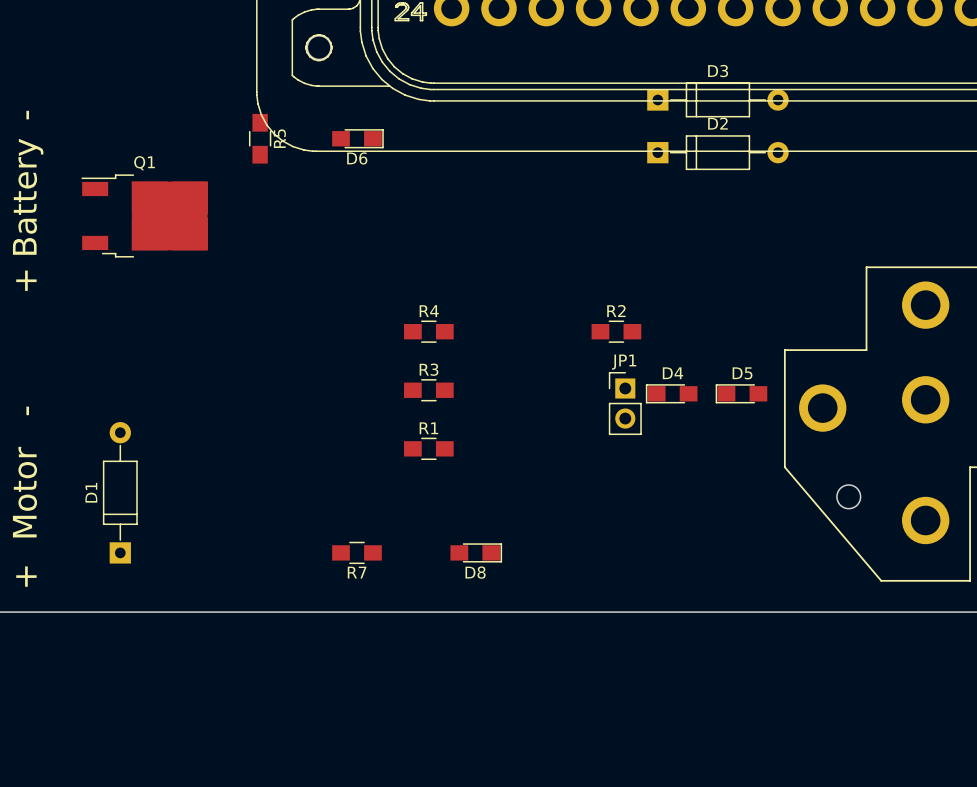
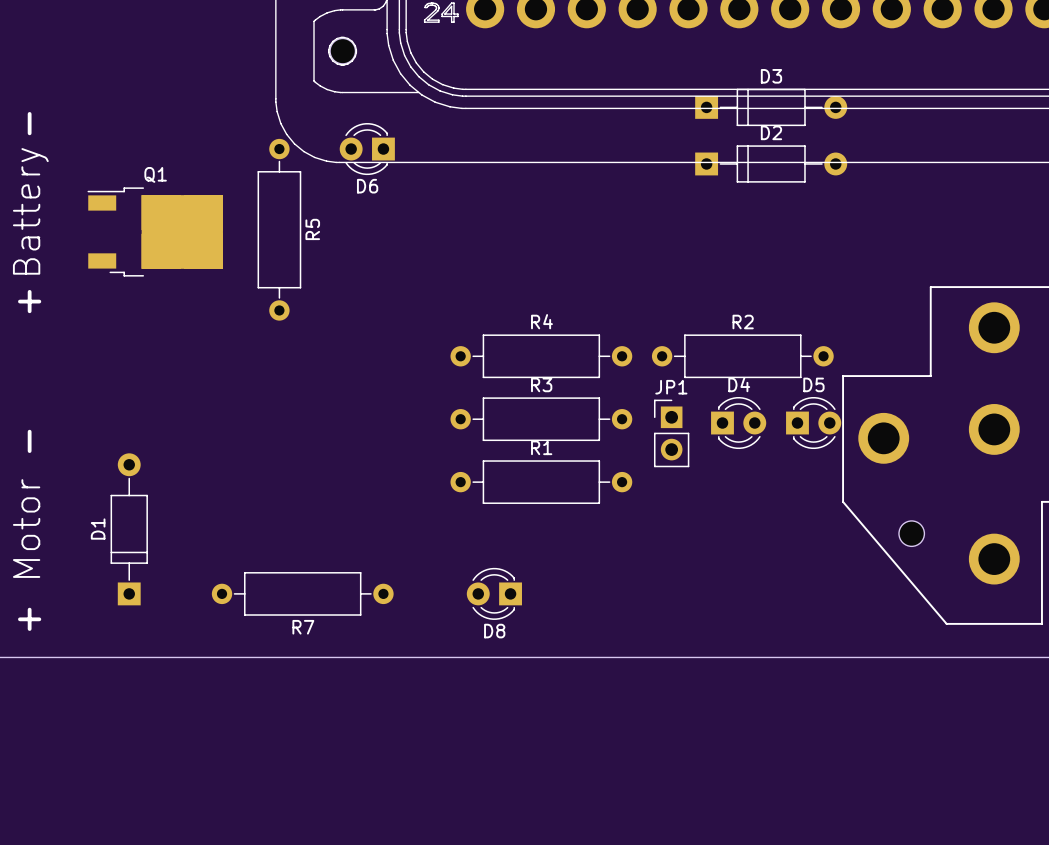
R5 footprint: [249, 113, 272, 164] -> [257, 138, 302, 321]
D6 footprint: [332, 129, 384, 149] -> [339, 123, 395, 176]
R4 footprint: [404, 320, 454, 343] -> [450, 334, 633, 379]
R2 footprint: [591, 320, 642, 343] -> [651, 334, 834, 379]
R3 footprint: [404, 379, 454, 402] -> [450, 397, 633, 442]
D4 footprint: [645, 384, 698, 404] -> [711, 396, 767, 450]
D5 footprint: [715, 384, 768, 404] -> [786, 396, 842, 450]
R1 footprint: [404, 437, 454, 460] -> [450, 460, 633, 504]
R7 footprint: [332, 541, 382, 565] -> [211, 572, 394, 616]
D8 footprint: [450, 543, 503, 563] -> [466, 567, 522, 620]

